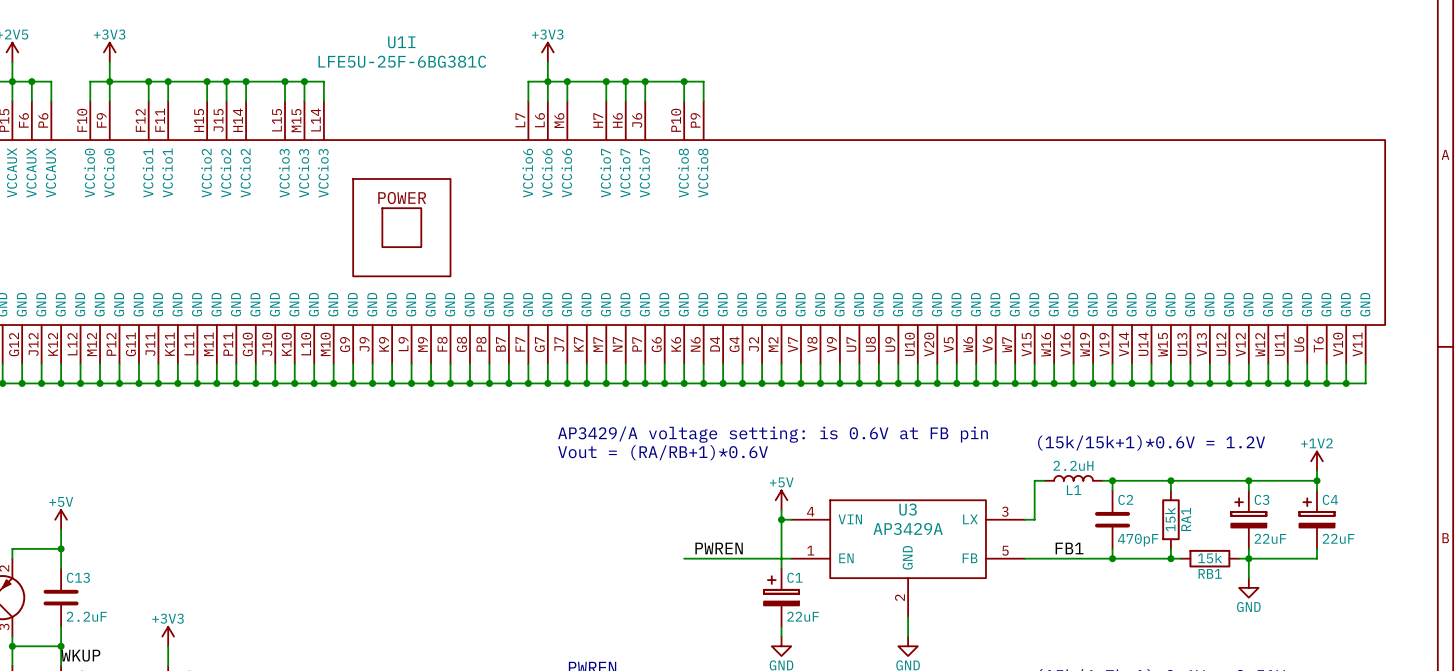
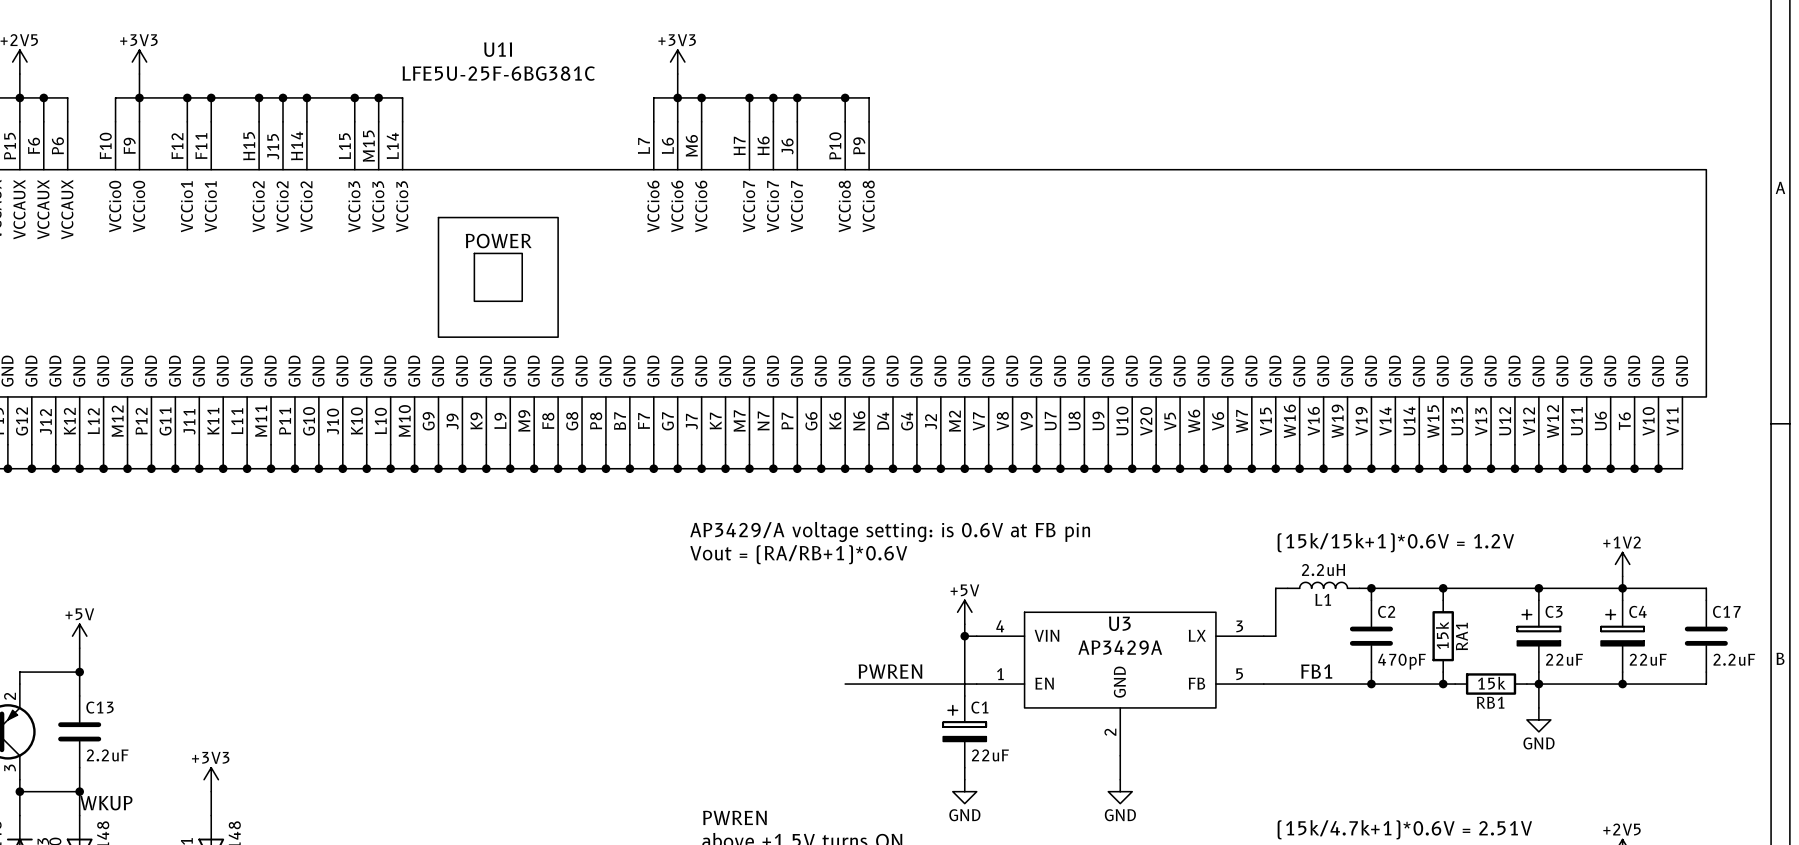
wire: none -> (1622, 588) (1706, 588) (1706, 600)
C17: none -> 2.2uF (1706, 636)
wire: none -> (1706, 672) (1706, 684) (1622, 684)
junction: none -> (1622, 684)

